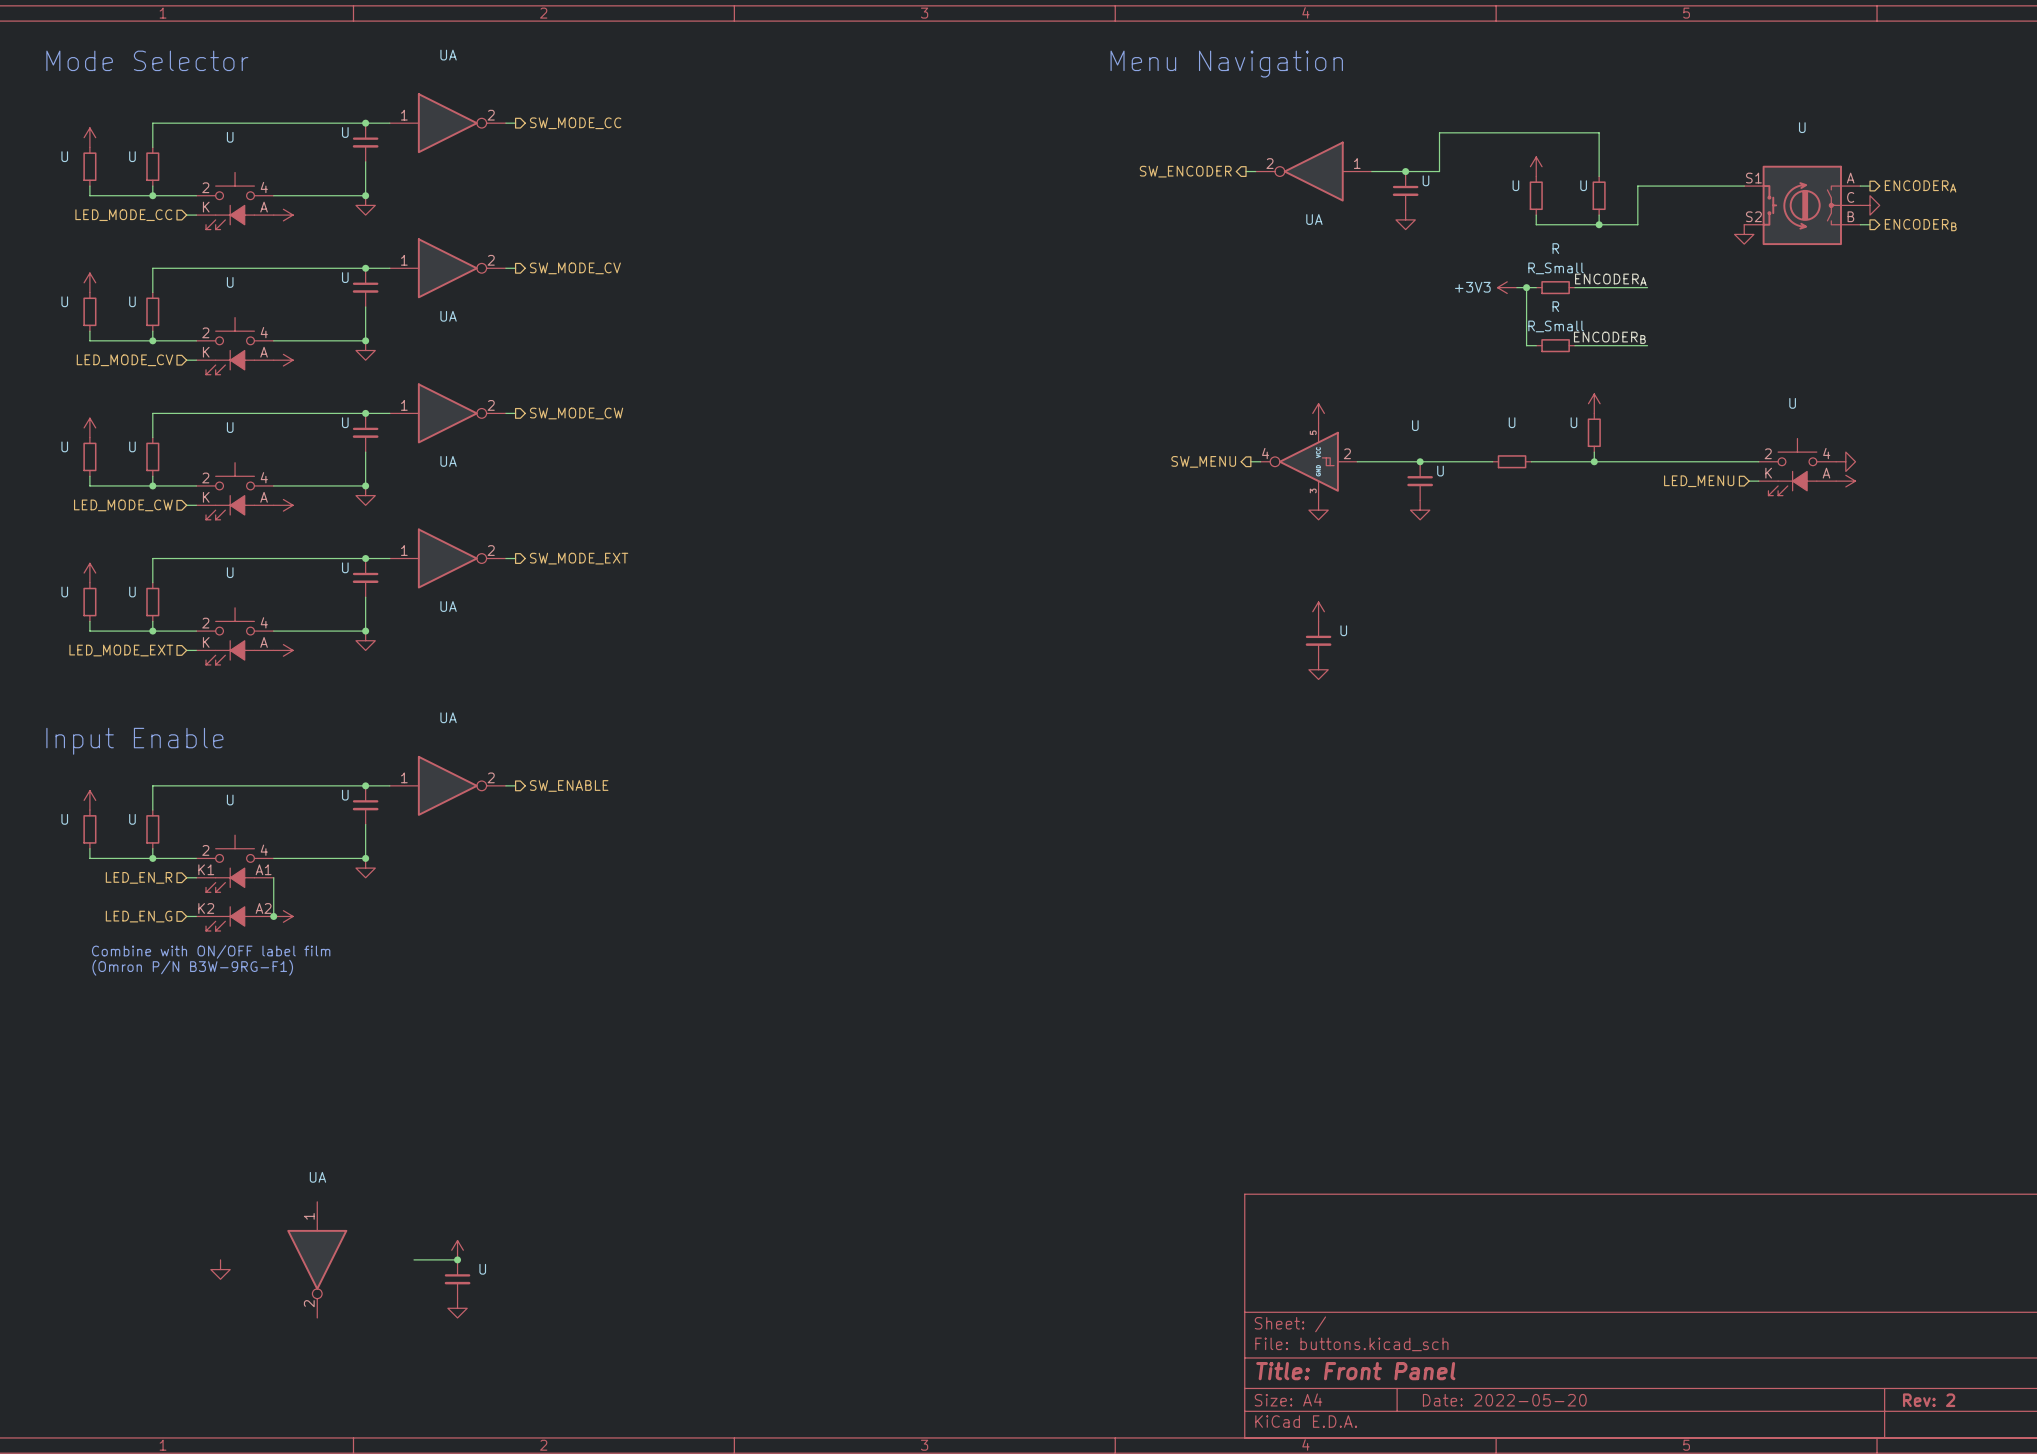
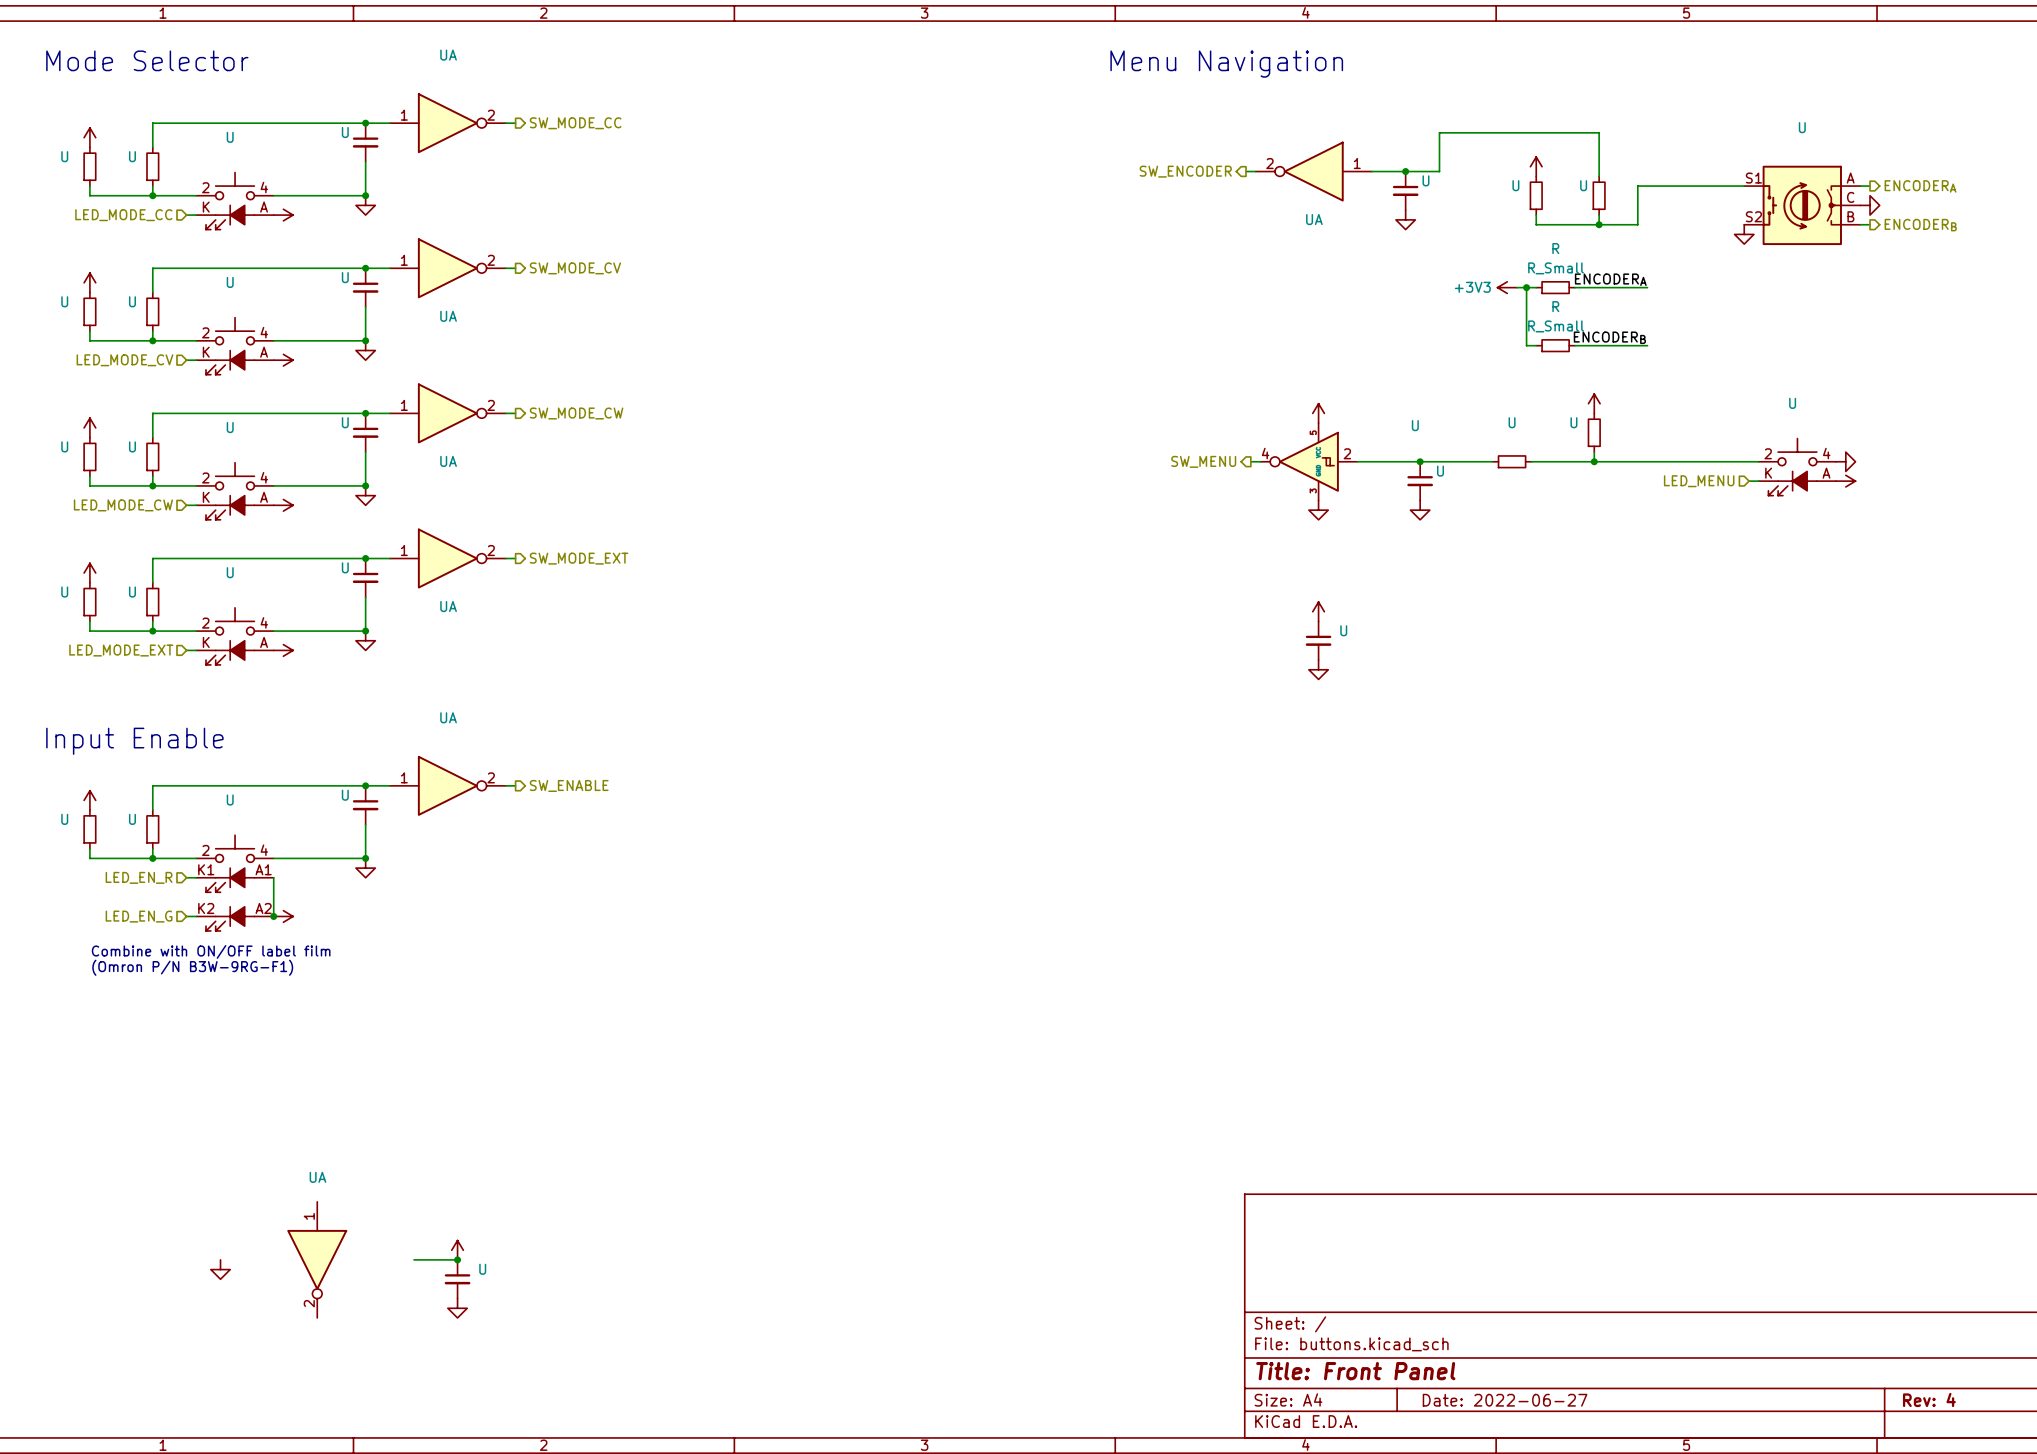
title block: Date: 2022-05-20 (1504, 1400) -> Date: 2022-06-27 (1505, 1400)
title block: Rev: 2 (1929, 1400) -> Rev: 4 (1929, 1399)

